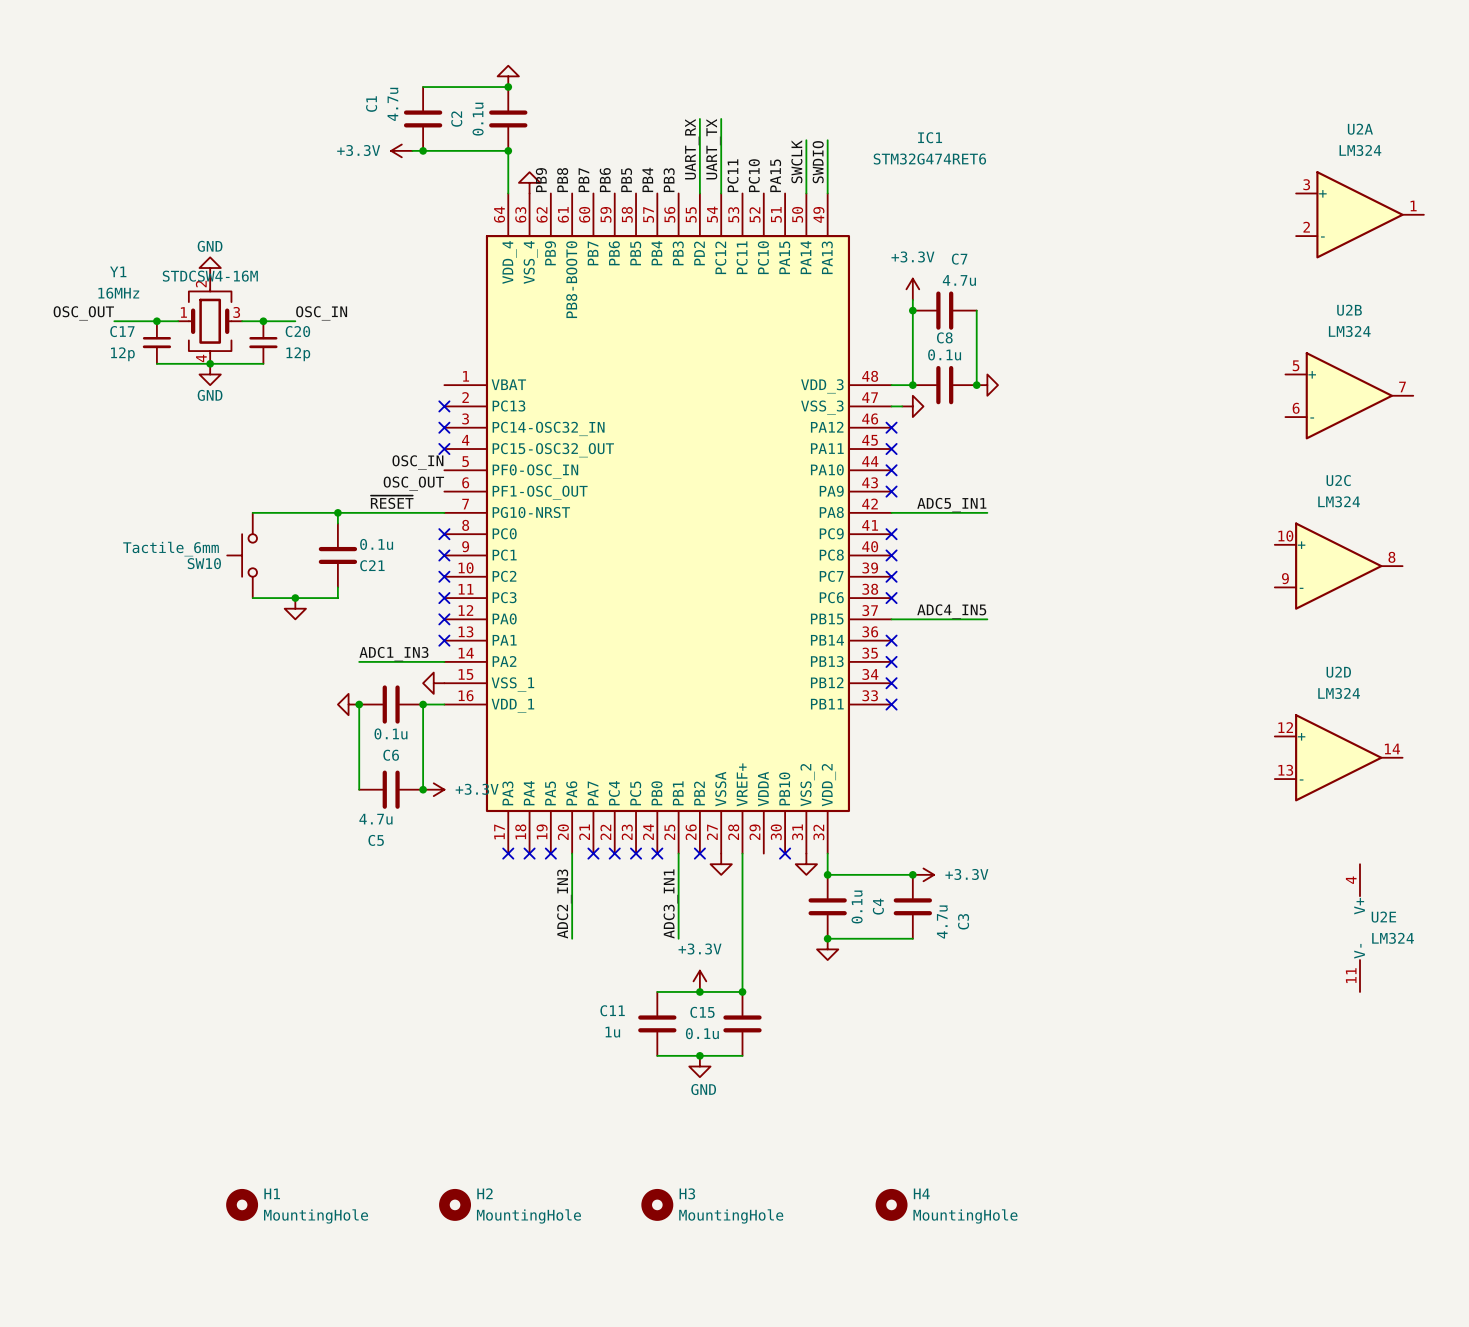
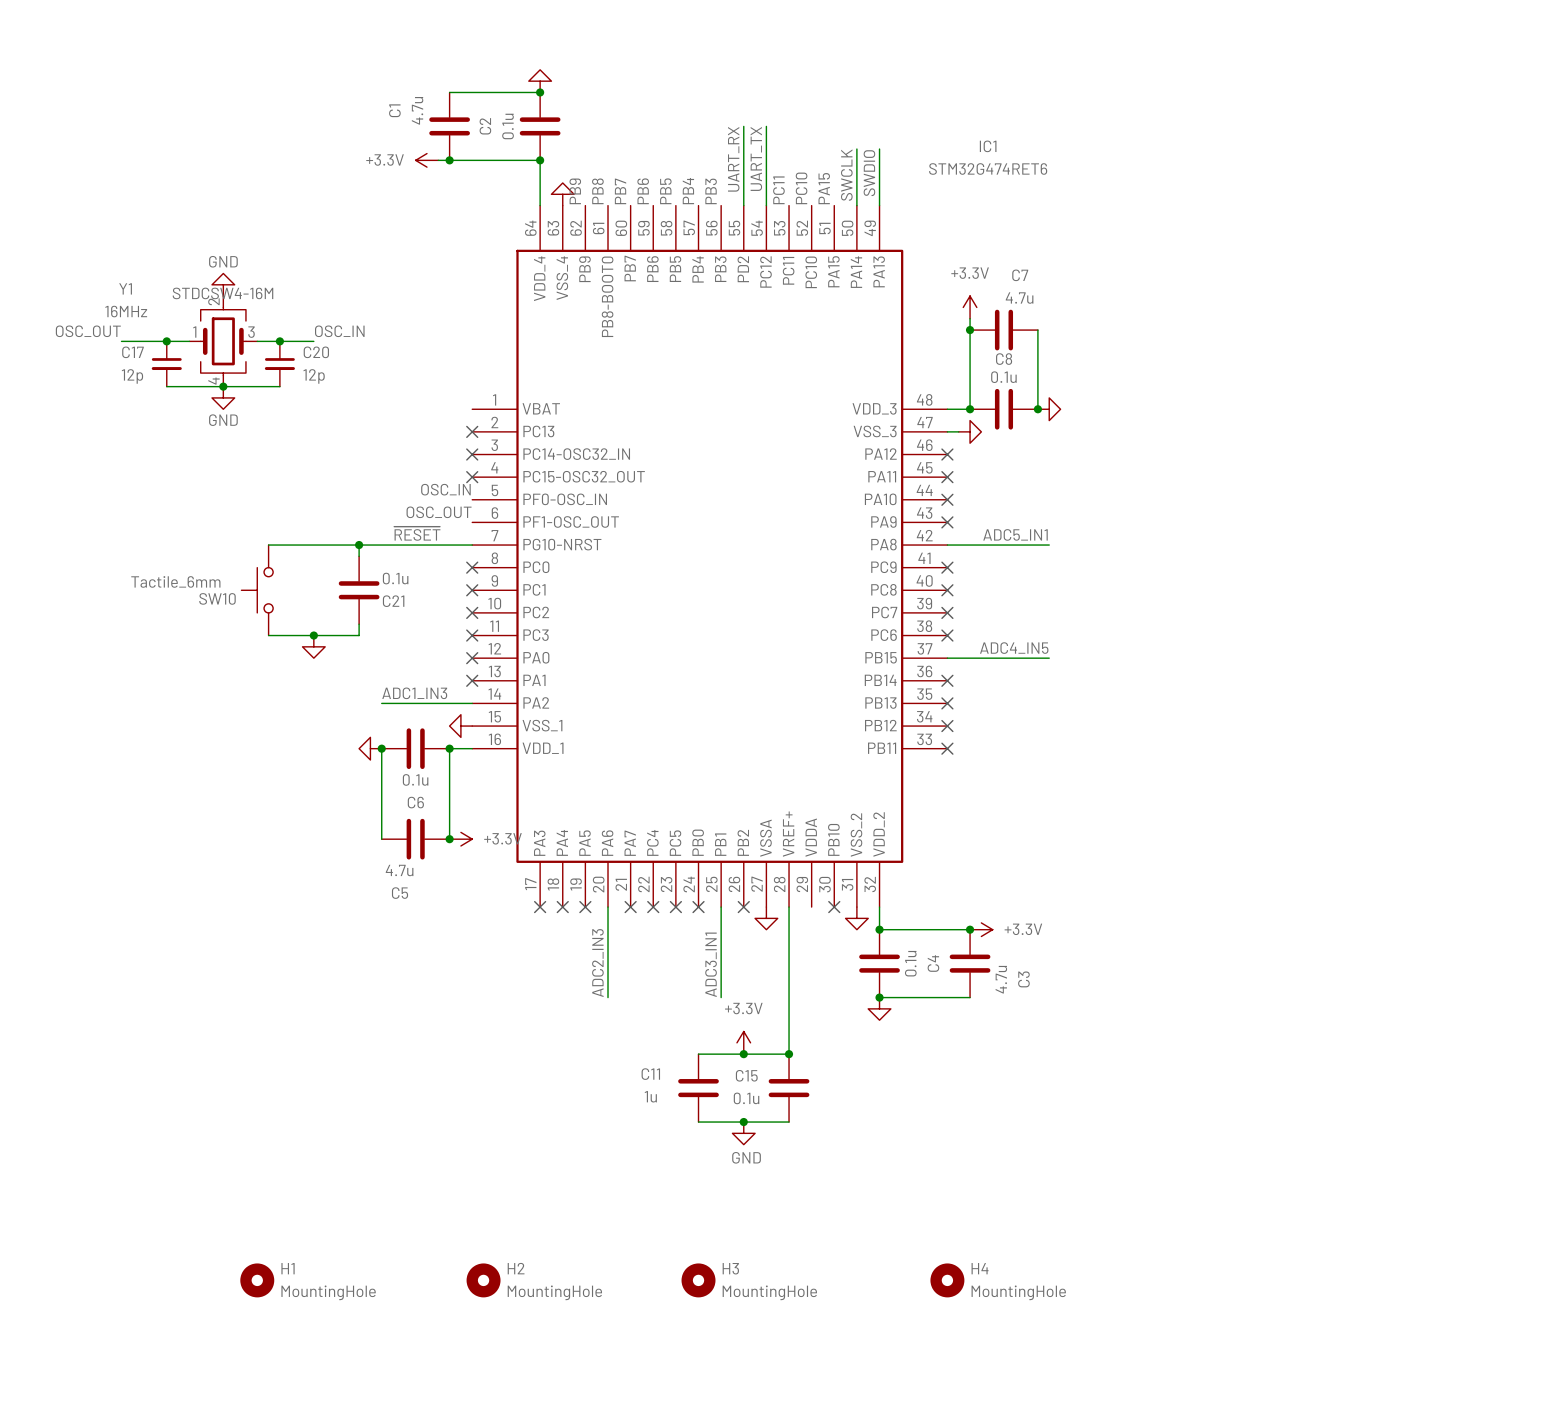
U2A: LM324 (1359, 214) -> none
U2B: LM324 (1349, 395) -> none
U2C: LM324 (1338, 566) -> none
U2D: LM324 (1338, 757) -> none
U2E: LM324 (1359, 928) -> none

